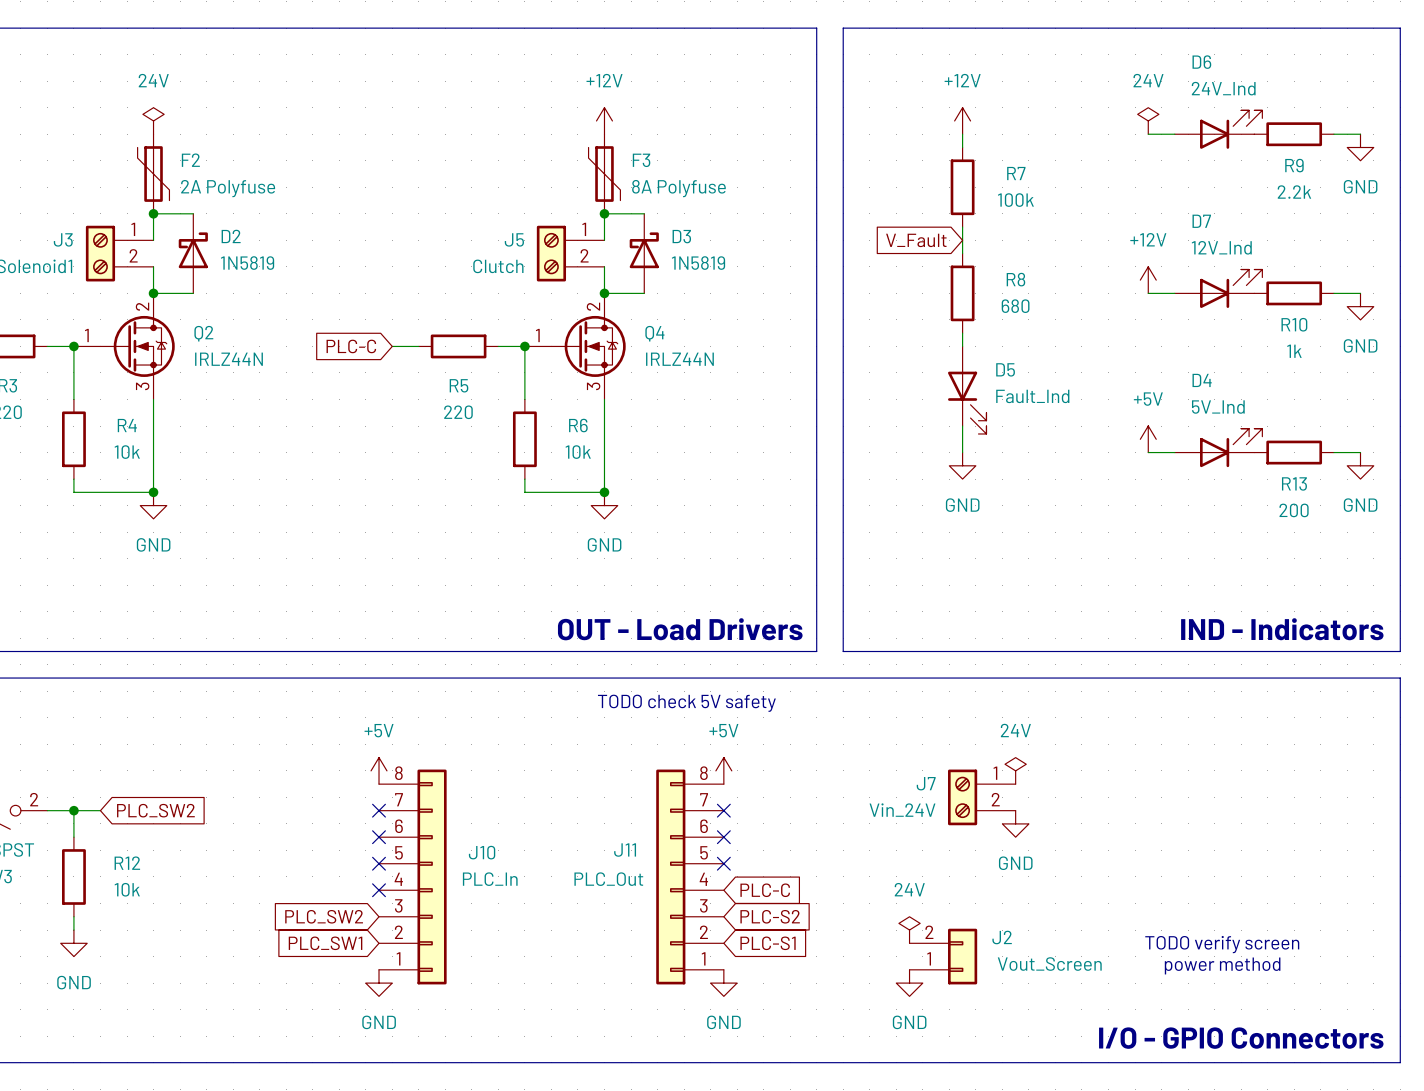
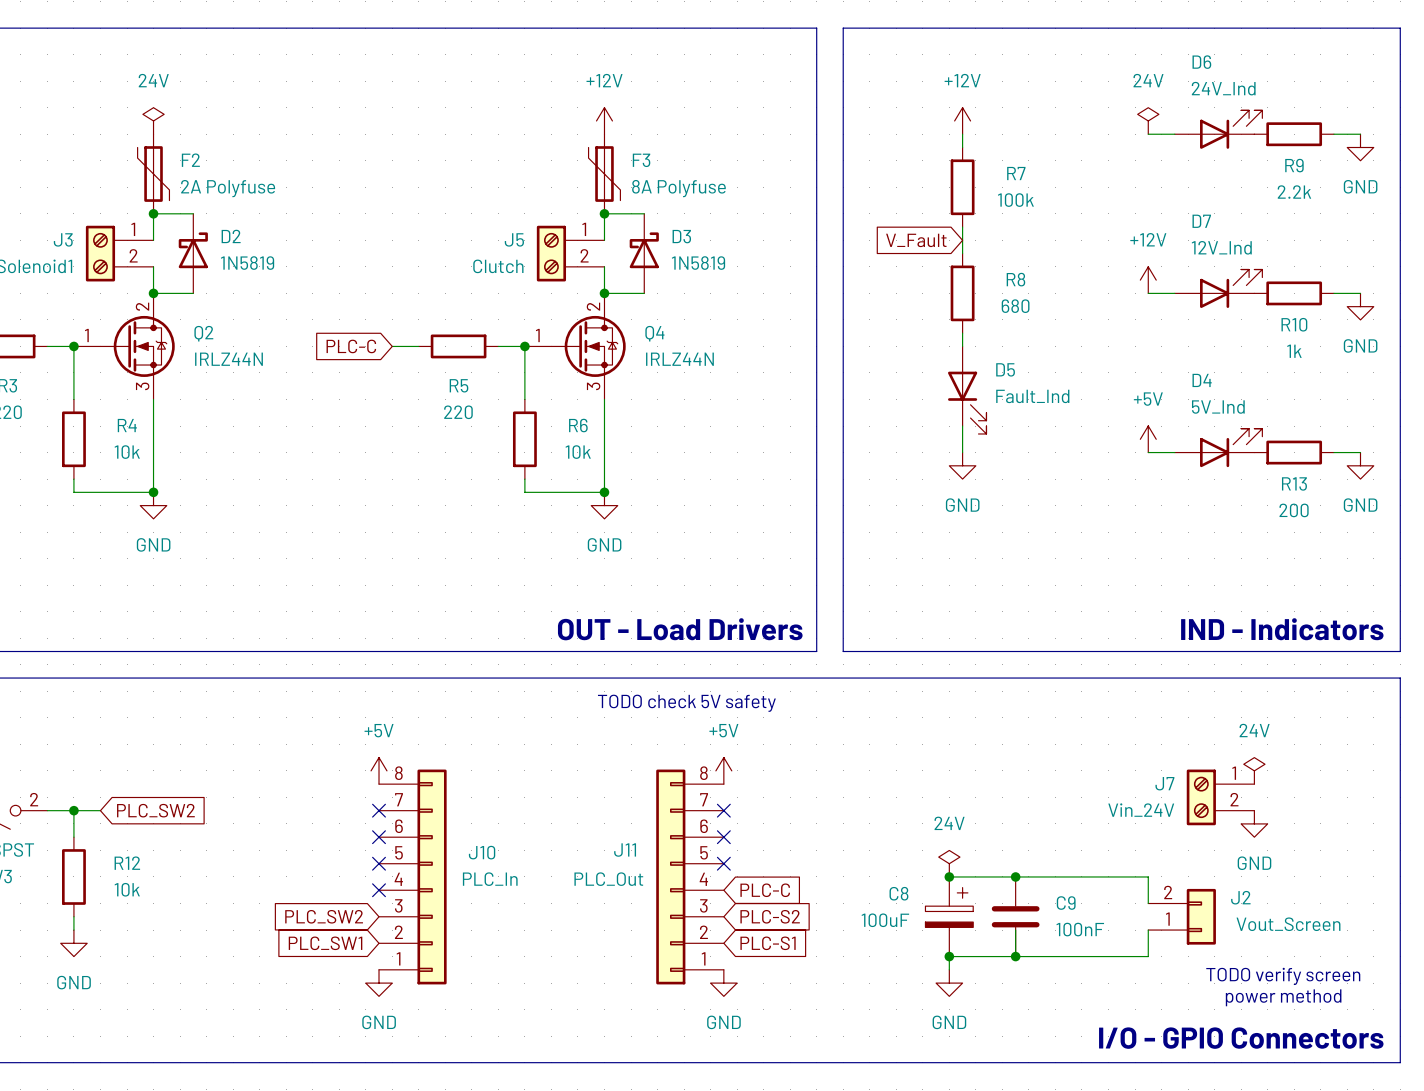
power symbol: 24V (1015, 770) -> none
power symbol: none -> 24V (1254, 770)
J7 position: (981, 797) -> (1220, 797)
power symbol: GND (1015, 823) -> none
power symbol: none -> GND (1254, 823)
power symbol: none -> 24V (949, 863)
wire: none -> (949, 876) (1148, 876) (1148, 903)
junction: none -> (949, 876)
junction: none -> (1015, 876)
C8: none -> 100uF (949, 916)
C9: none -> 100nF (1015, 916)
power symbol: 24V (909, 930) -> none
wire: none -> (1015, 930) (1015, 956)
wire: none -> (1148, 930) (1148, 956) (949, 956) (949, 969)
text position: TODO verify screen (1222, 944) -> TODO verify screen (1283, 976)
J2 position: (943, 956) -> (1182, 916)
junction: none -> (949, 956)
junction: none -> (1015, 956)
text position: power method (1222, 965) -> power method (1283, 997)
power symbol position: GND (909, 983) -> GND (949, 983)

